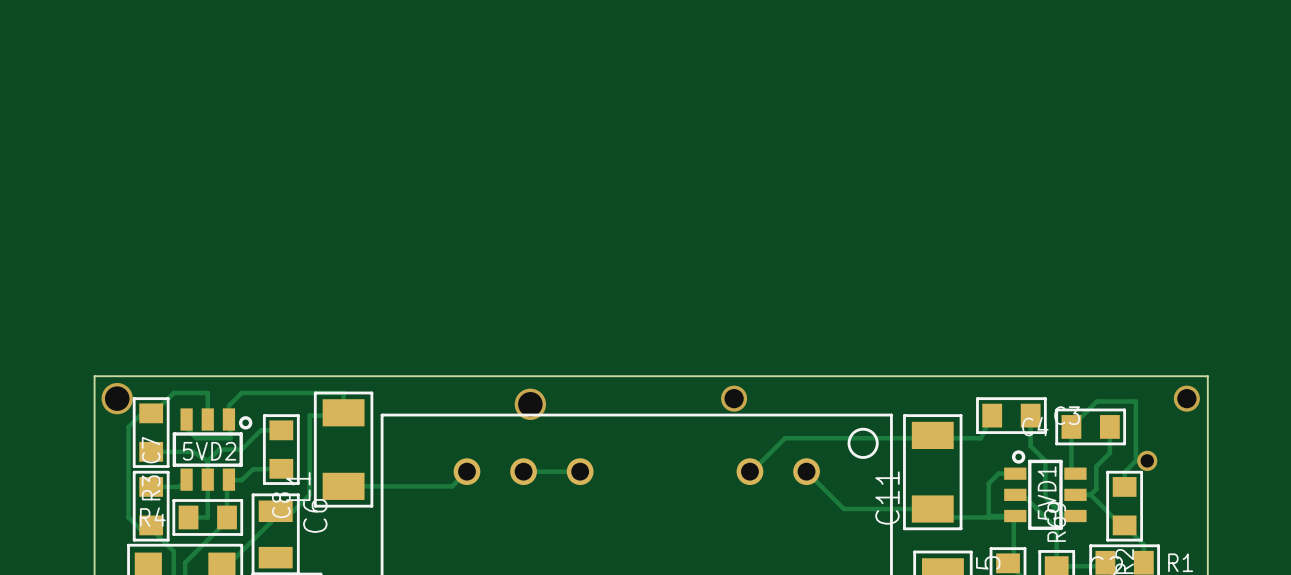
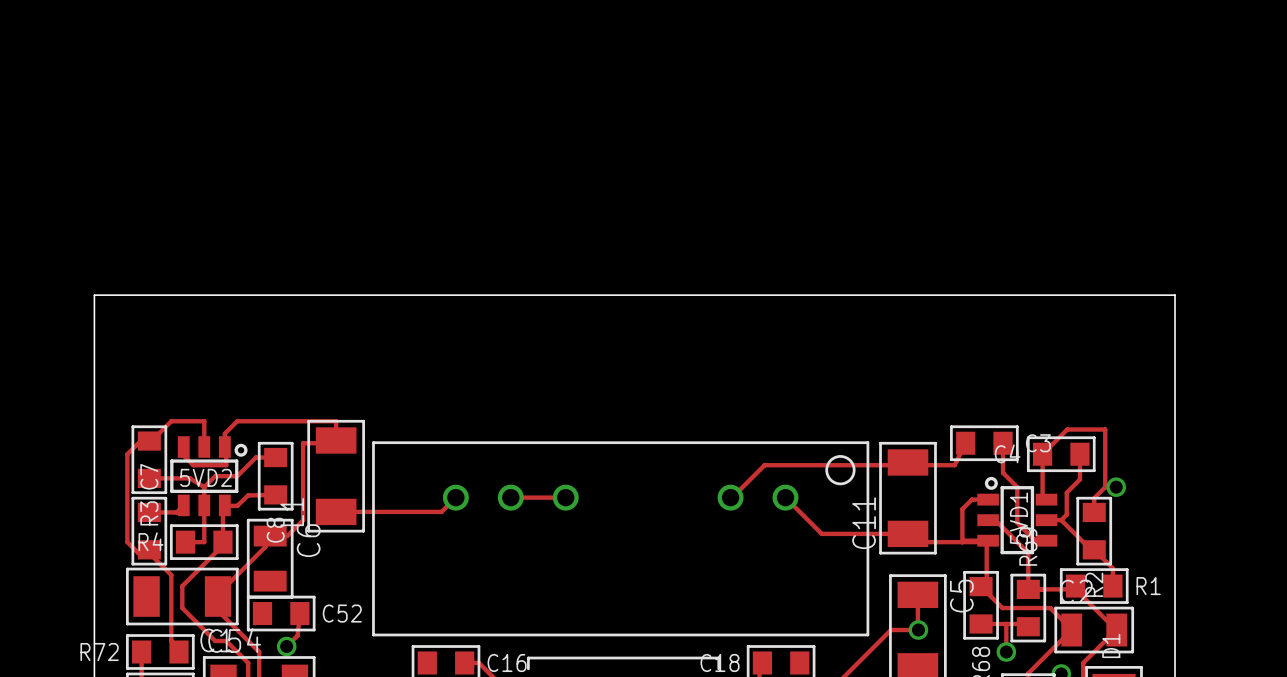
board edge: (94, 376) (1207, 376) -> (94, 405) (94, 295) (1175, 295) (1175, 405)
via: (117, 398) -> none
via: (734, 398) -> none
via: (1186, 398) -> none
via: (530, 404) -> none

